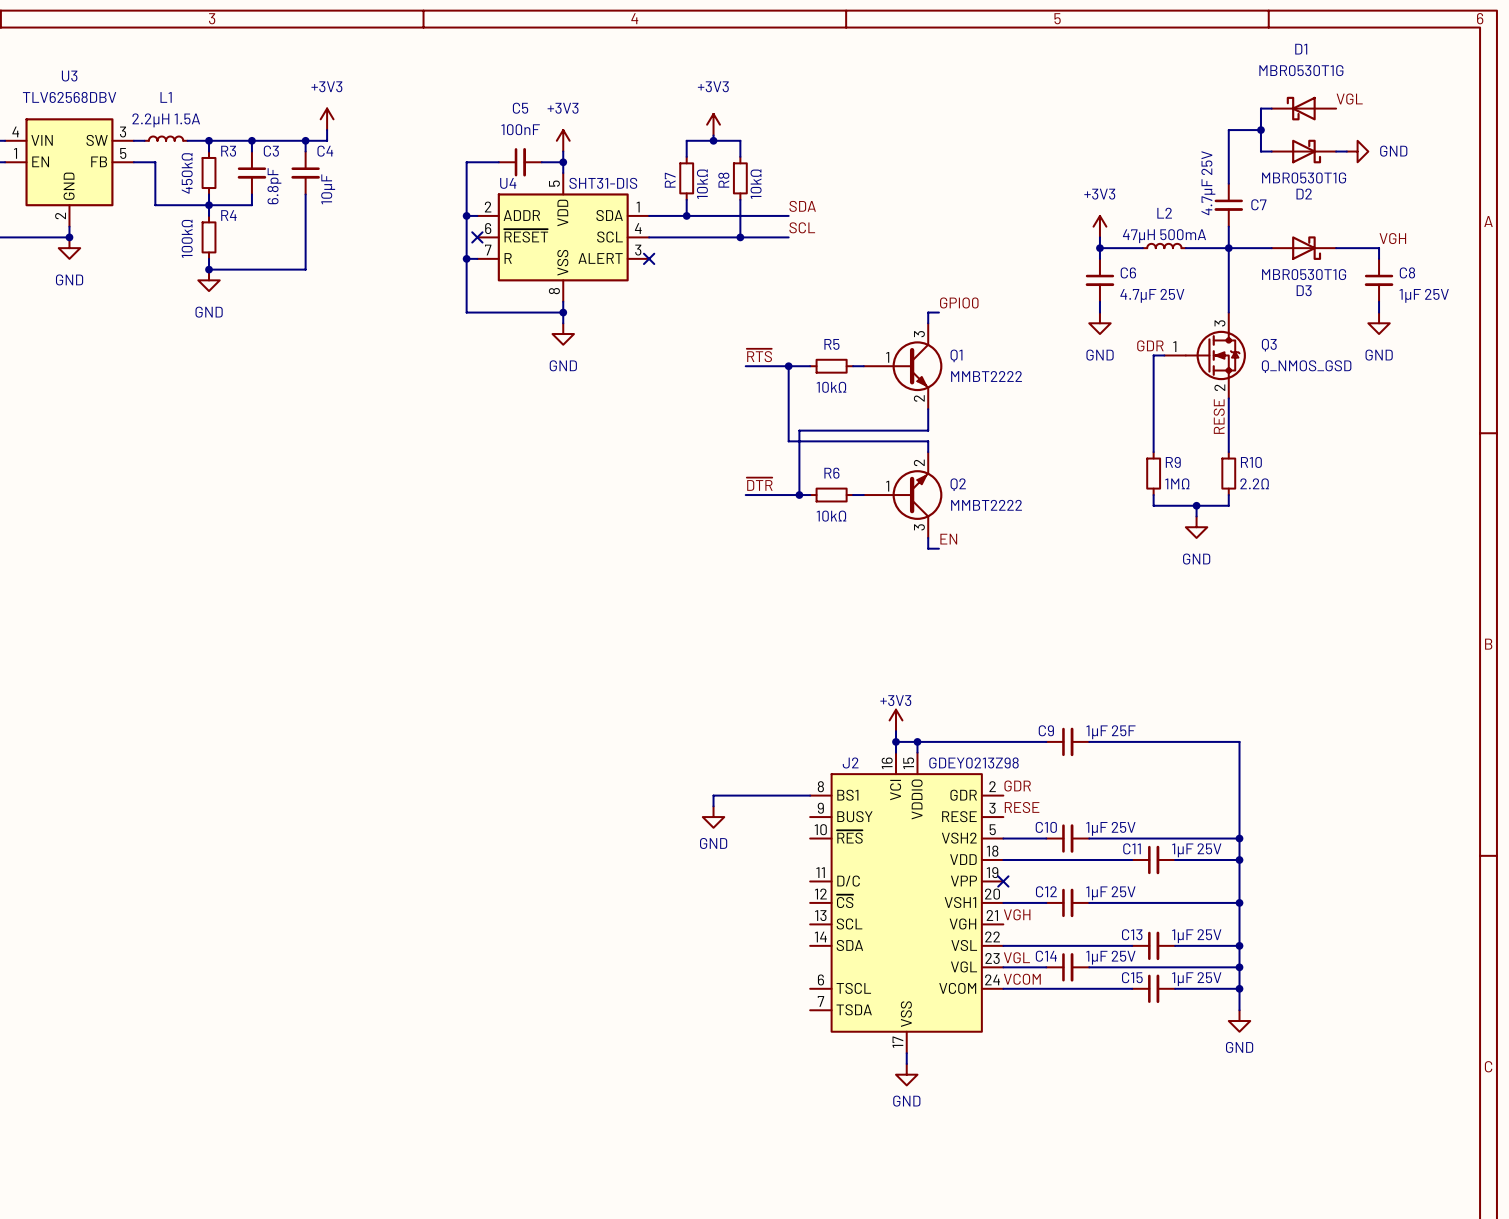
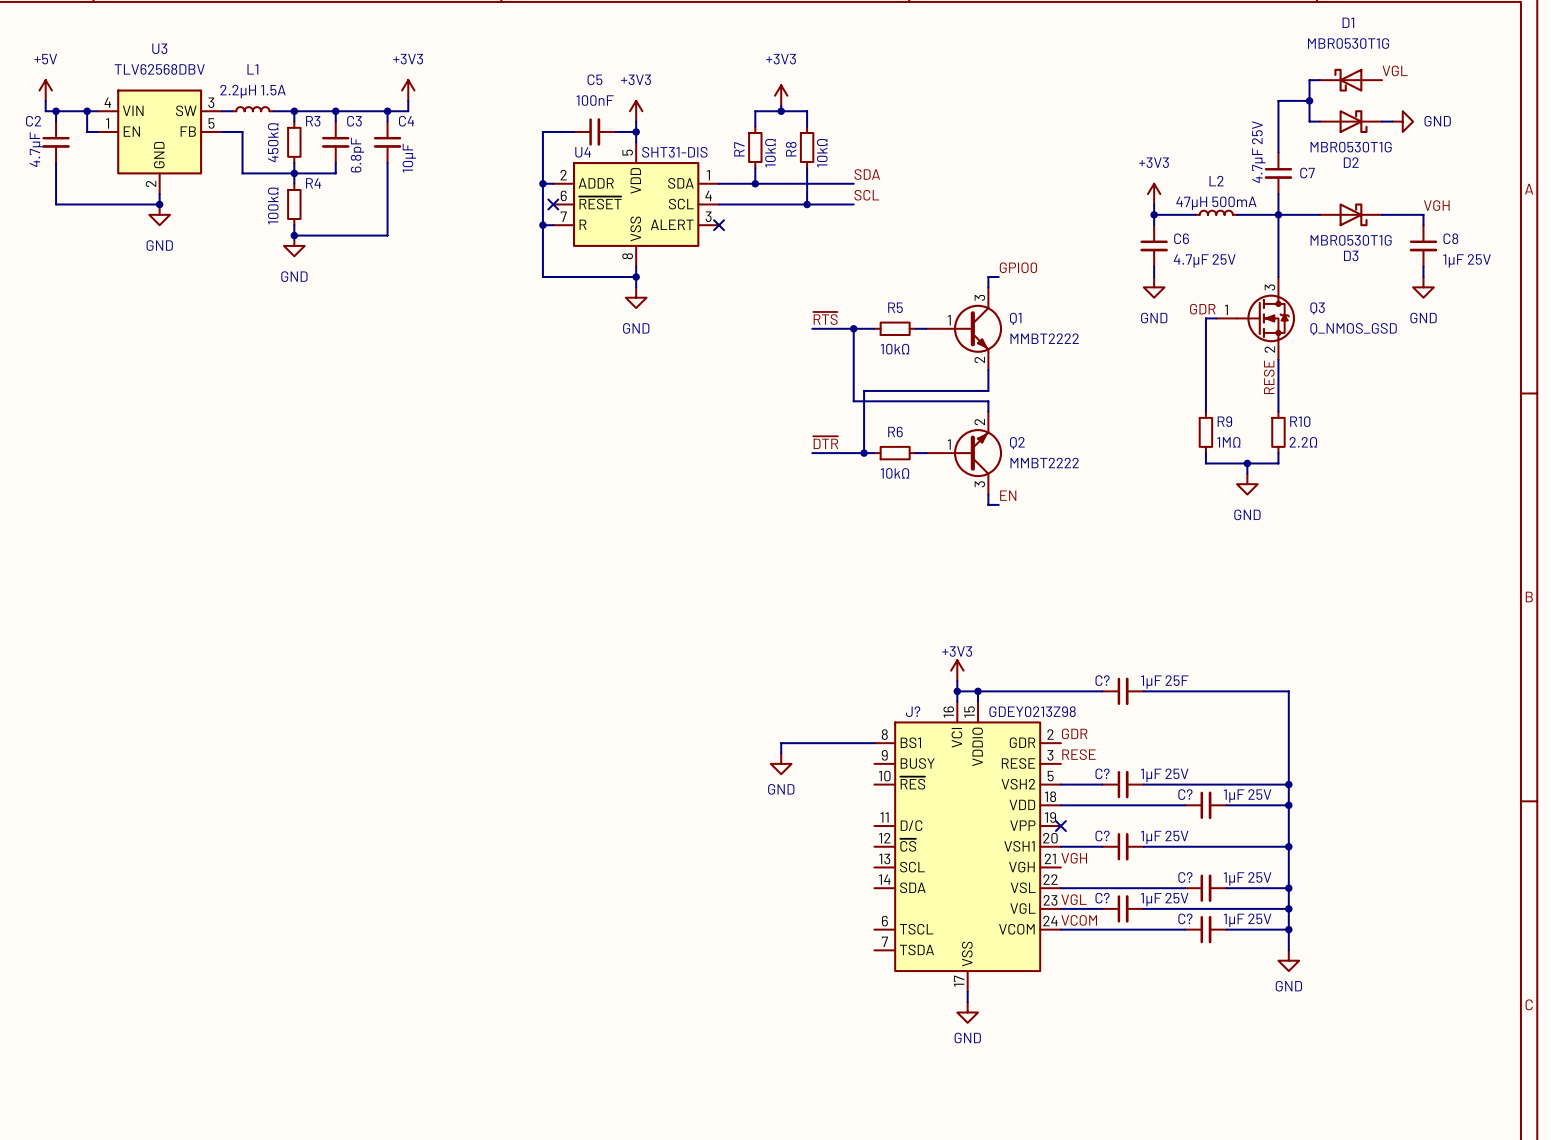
C9 name: C9 (1046, 730) -> C? (1102, 680)
J2 name: J2 (850, 762) -> J? (913, 711)
C10 name: C10 (1046, 827) -> C? (1102, 773)
C11 name: C11 (1132, 848) -> C? (1185, 794)
C12 name: C12 (1046, 891) -> C? (1102, 836)
C13 name: C13 (1132, 934) -> C? (1185, 877)
C14 name: C14 (1046, 956) -> C? (1102, 898)
C15 name: C15 (1132, 977) -> C? (1185, 918)

